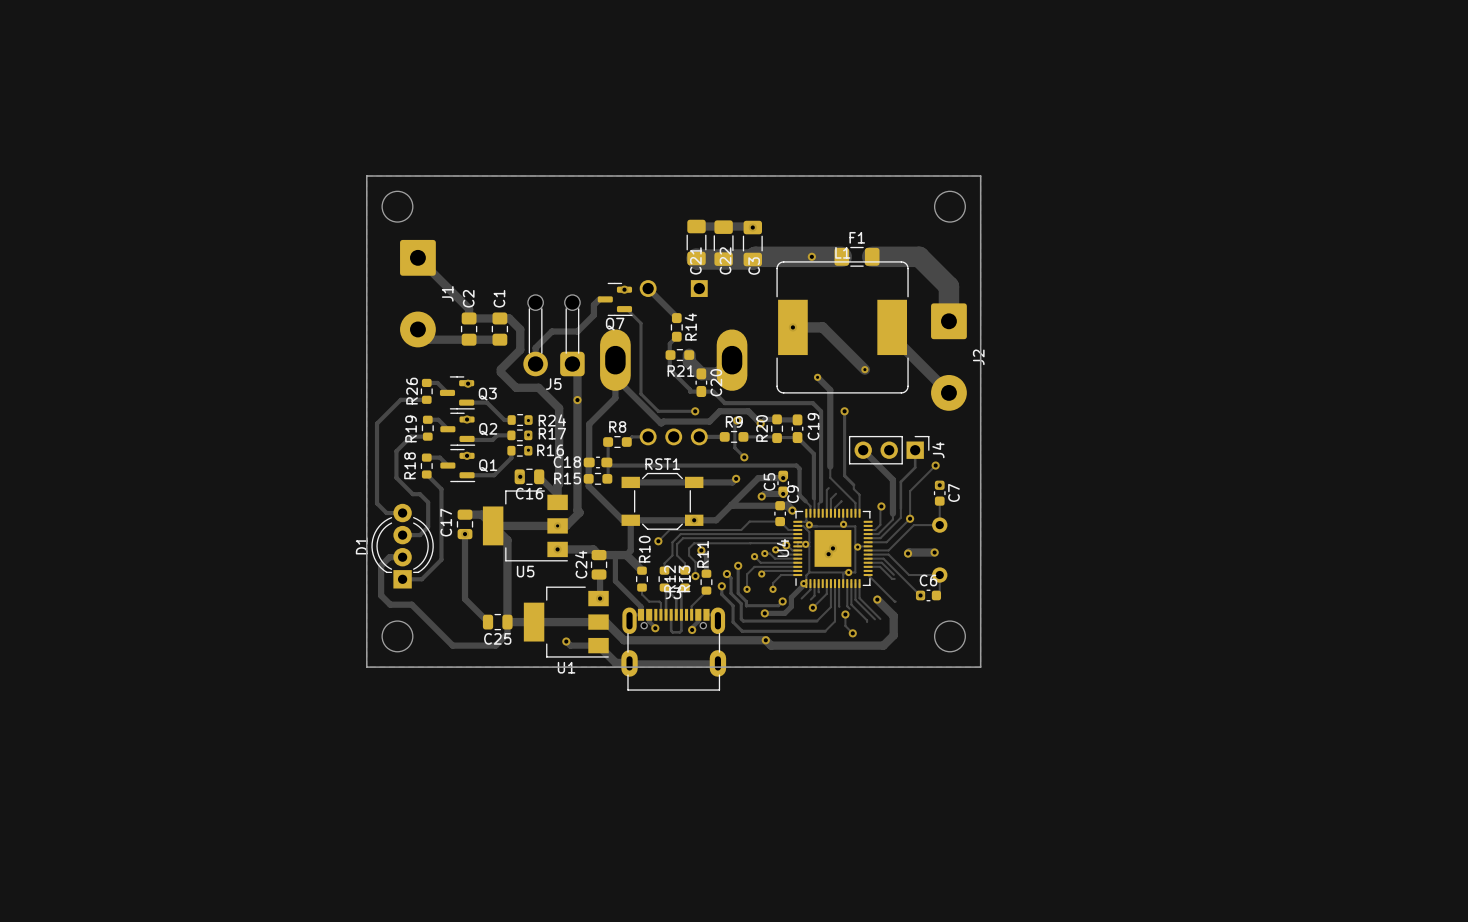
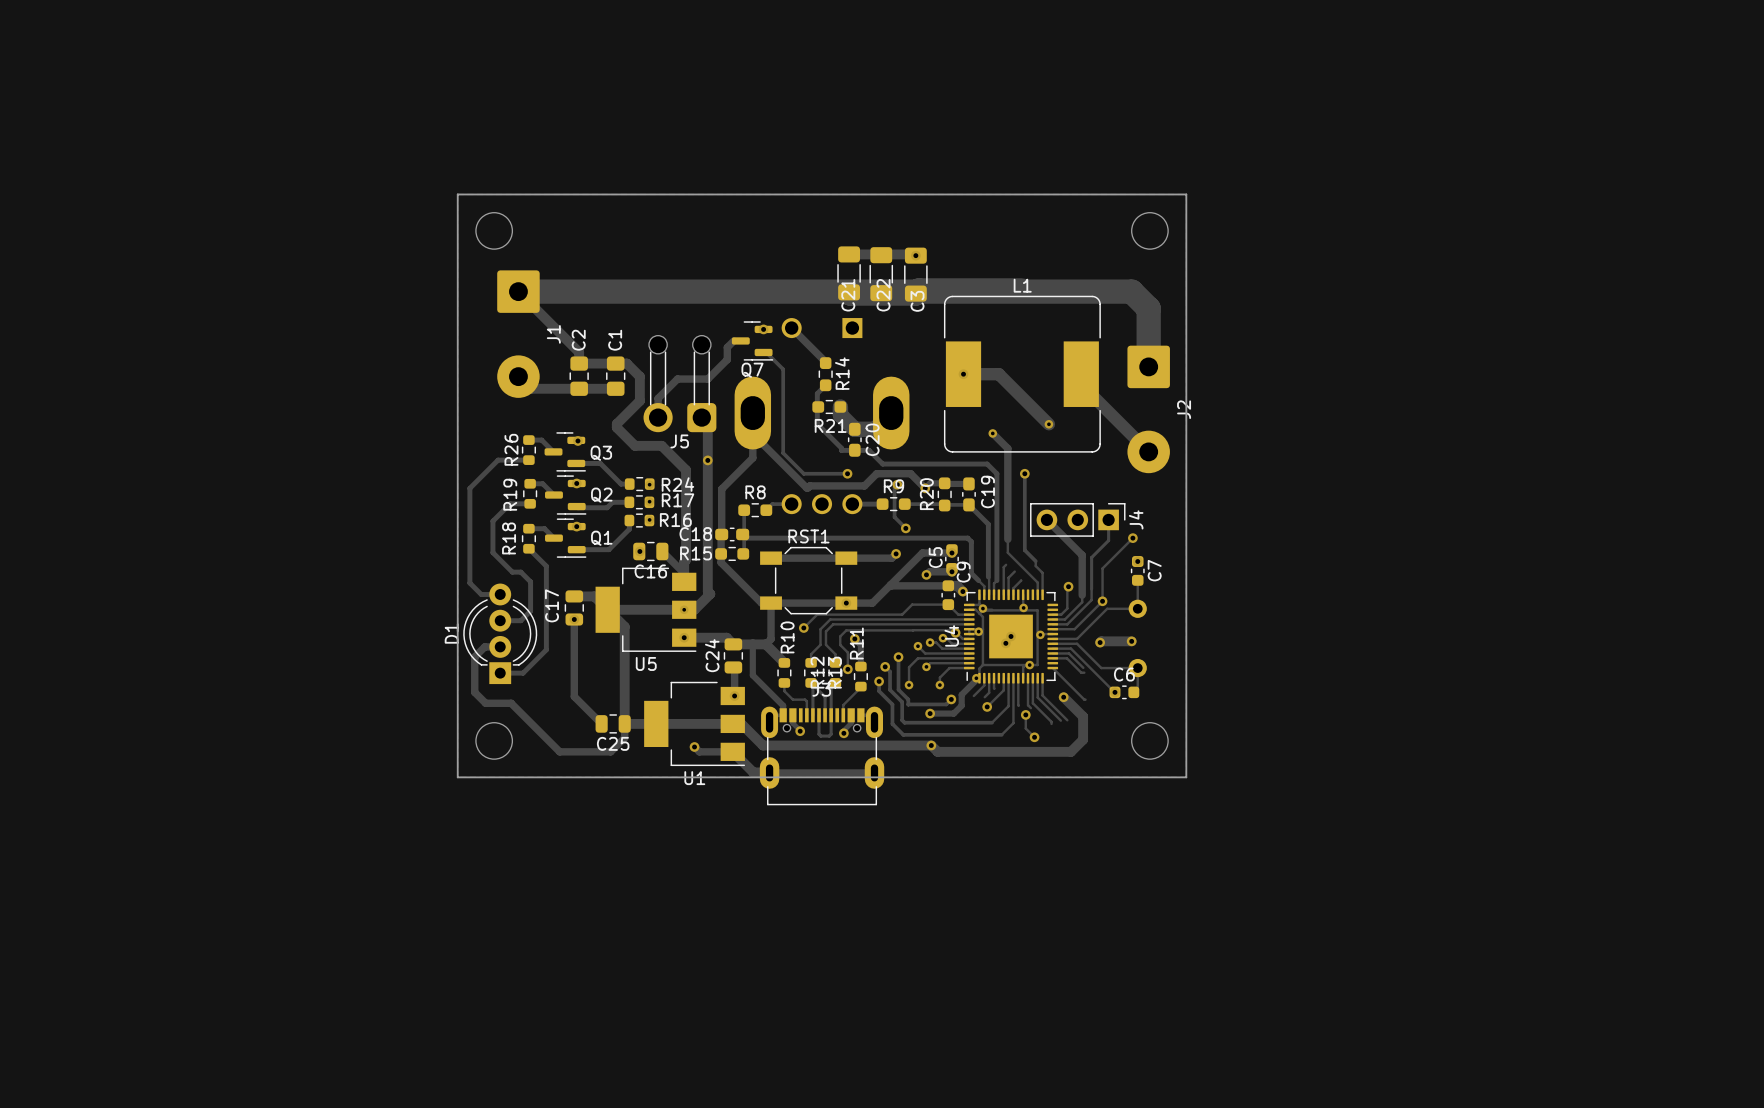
via: (811, 256) -> none
F1: (857, 256) -> none
track: (872, 256) (919, 256) (948, 286) -> (518, 291) (1131, 291) (1148, 308) (1148, 325)

